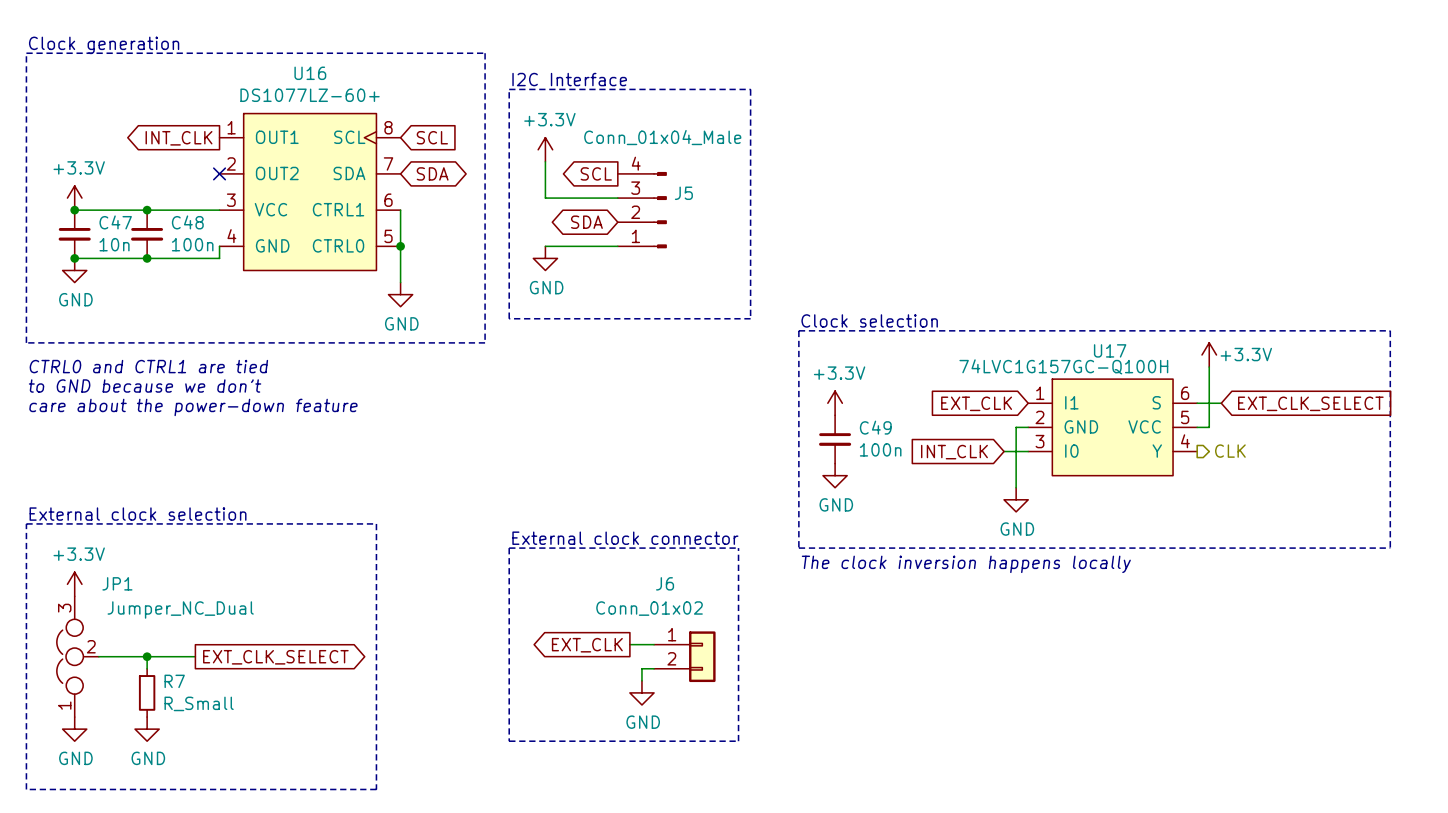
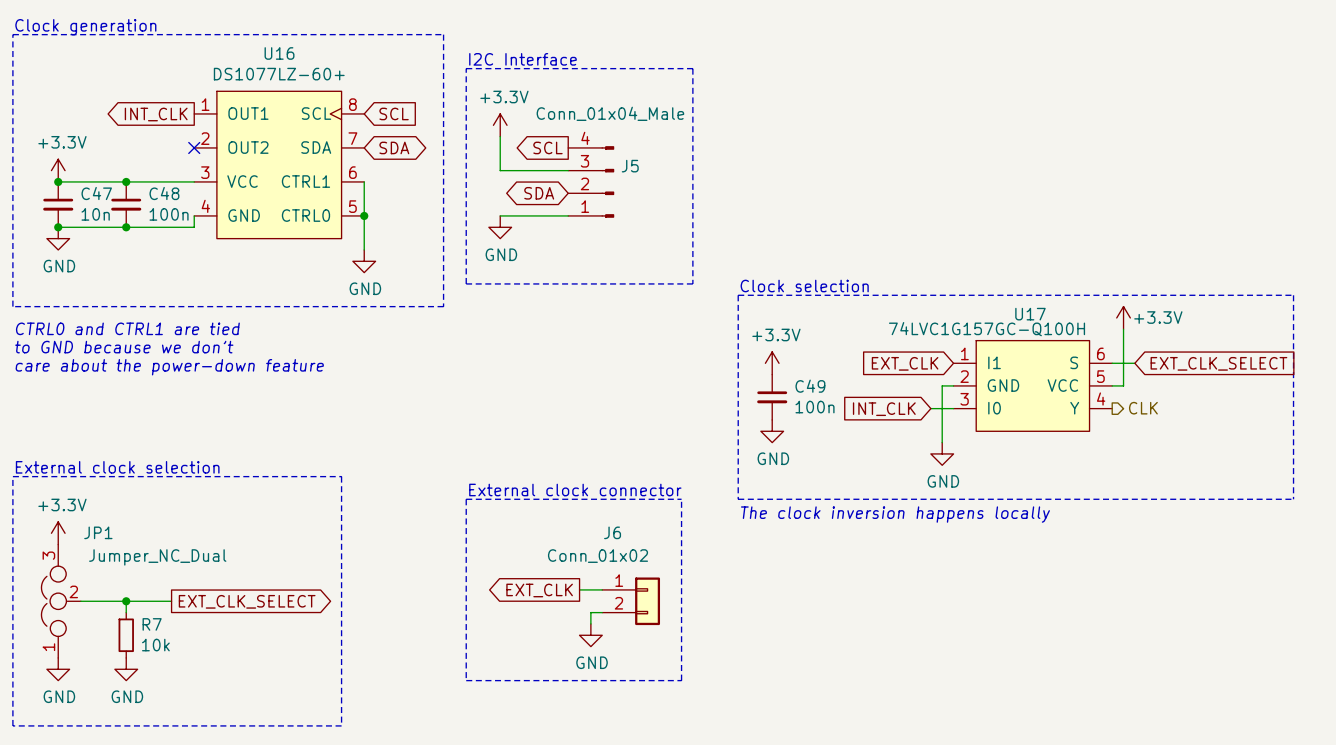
R7 value: R_Small (199, 703) -> 10k (155, 645)

